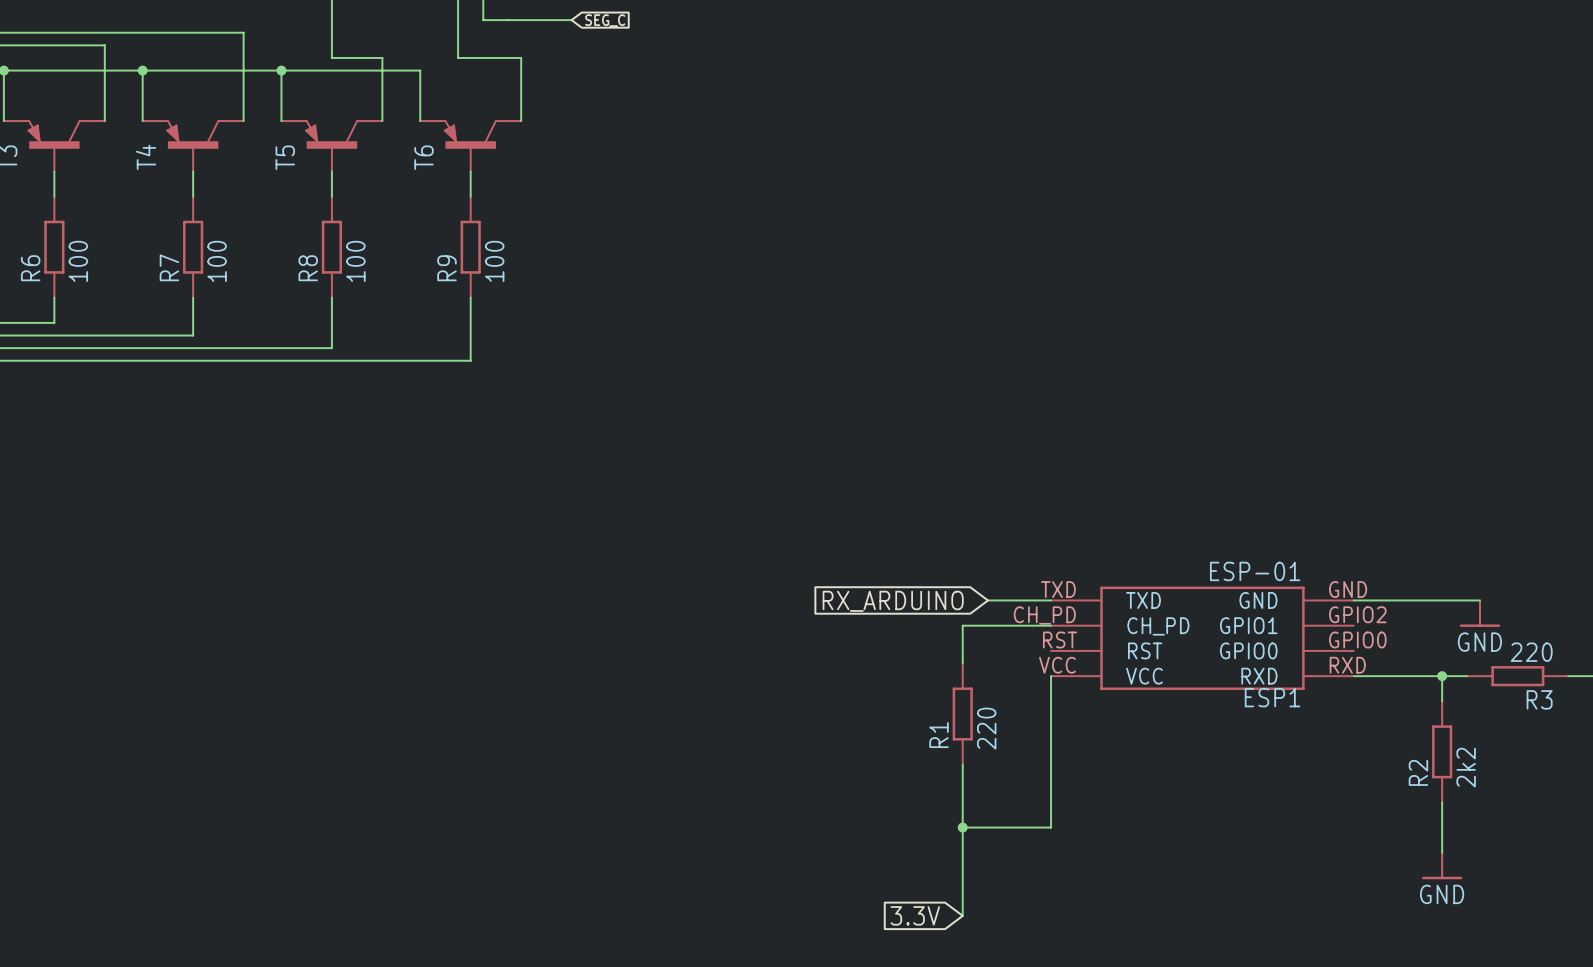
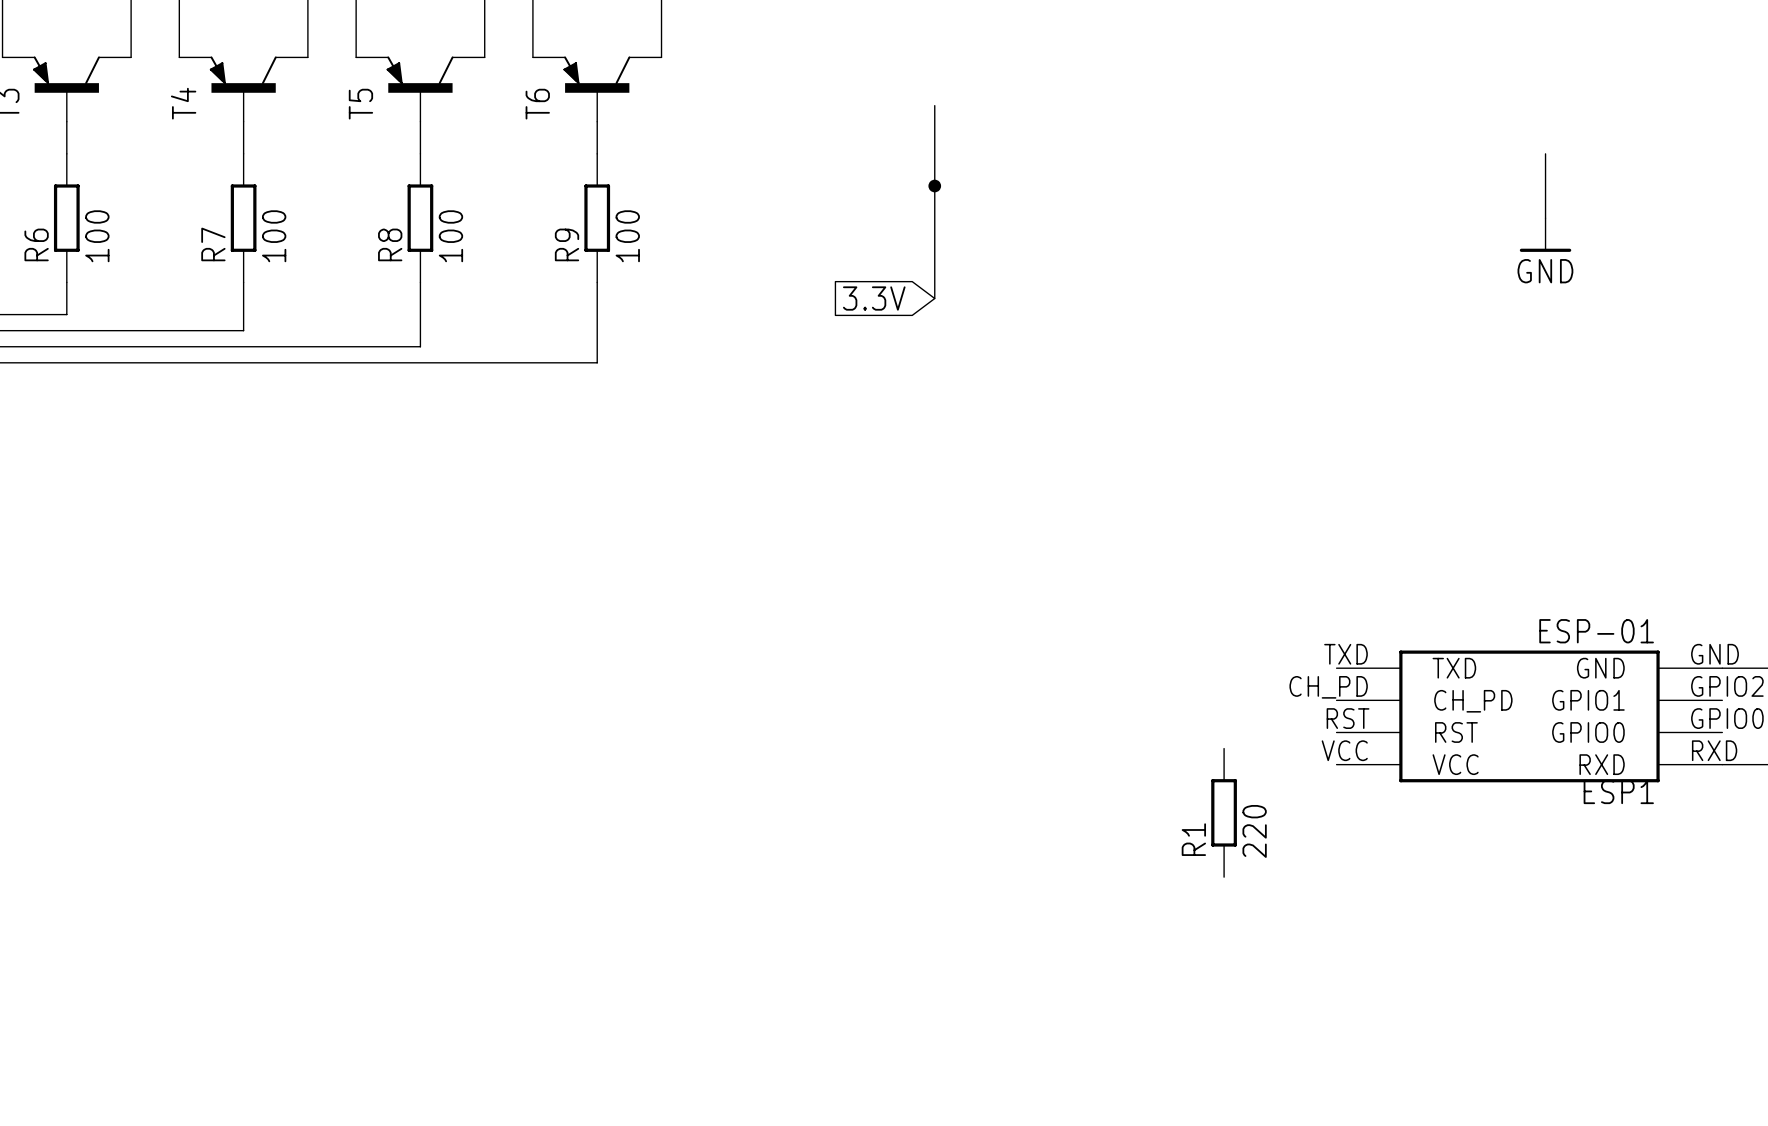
wire: none -> (934, 105) (934, 298)
wire: none -> (1545, 153) (1545, 218)
junction: none -> (934, 186)
power symbol: none -> GND (1545, 235)
global label: none -> 3.3V (874, 298)
wire: (987, 600) (1051, 600) -> none
global label: RX_ARDUINO (893, 601) -> none
wire: (1051, 625) (962, 625) (962, 663) -> none
wire: (1051, 676) (1051, 827) (962, 827) -> none
wire: (962, 764) (962, 915) -> none
junction: (962, 827) -> none
global label: 3.3V (915, 915) -> none

